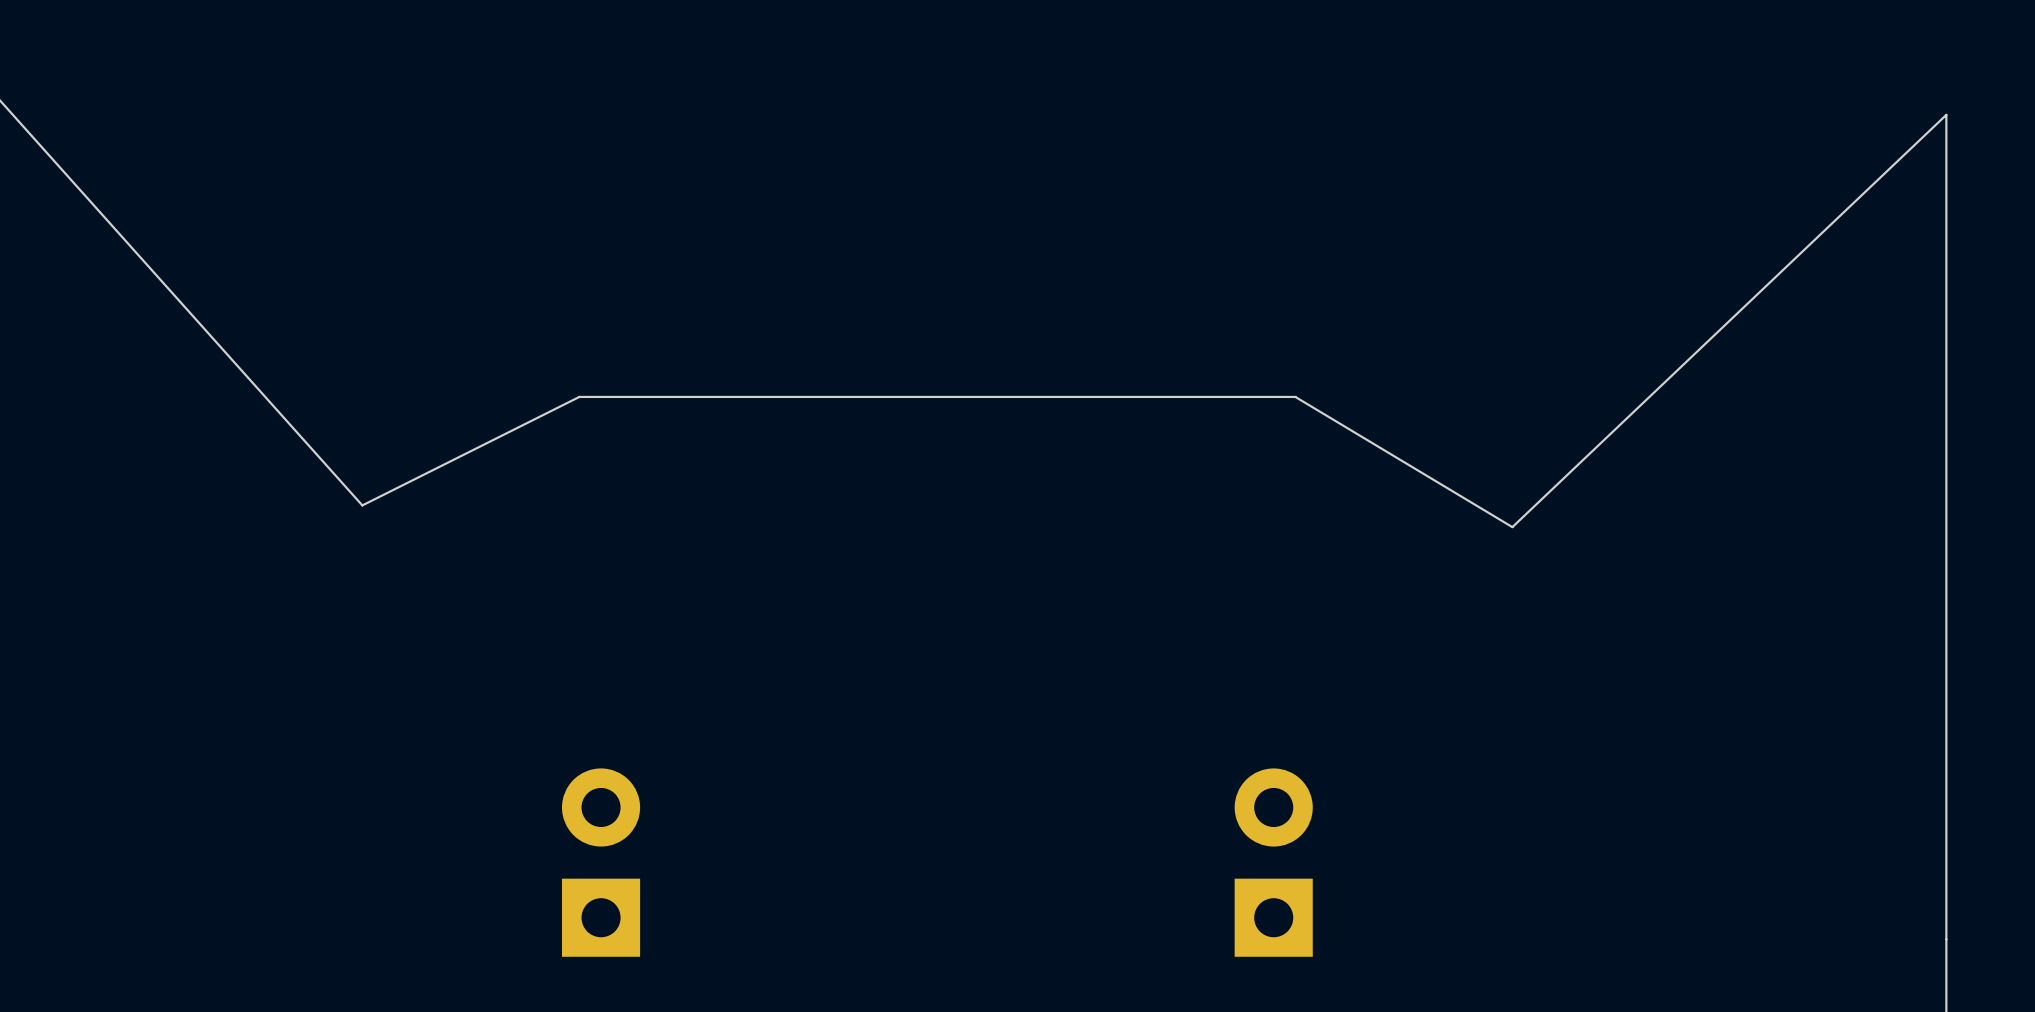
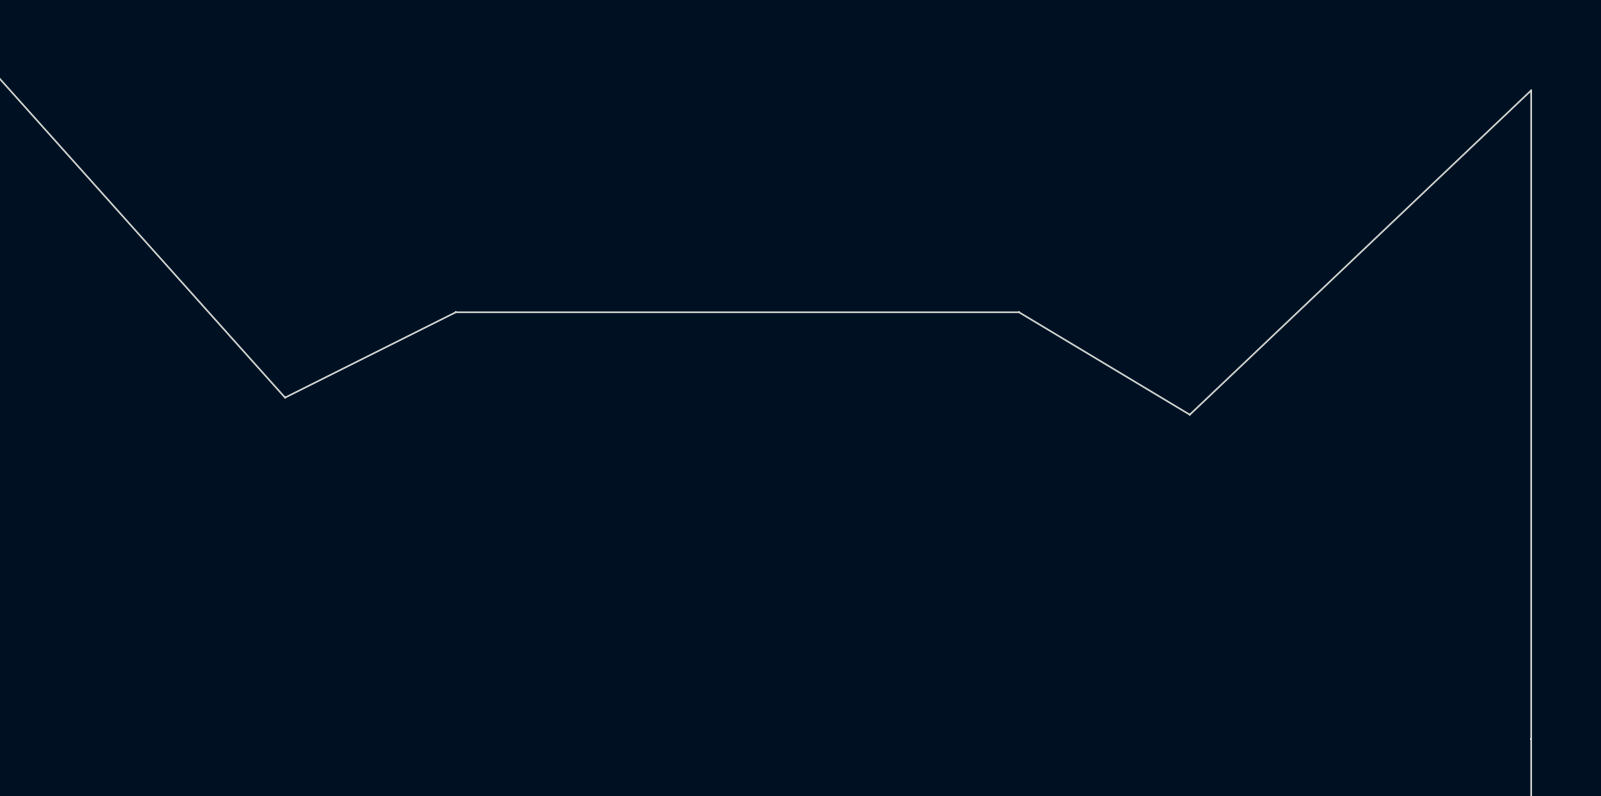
part: (601, 862) -> none
part: (1273, 862) -> none

